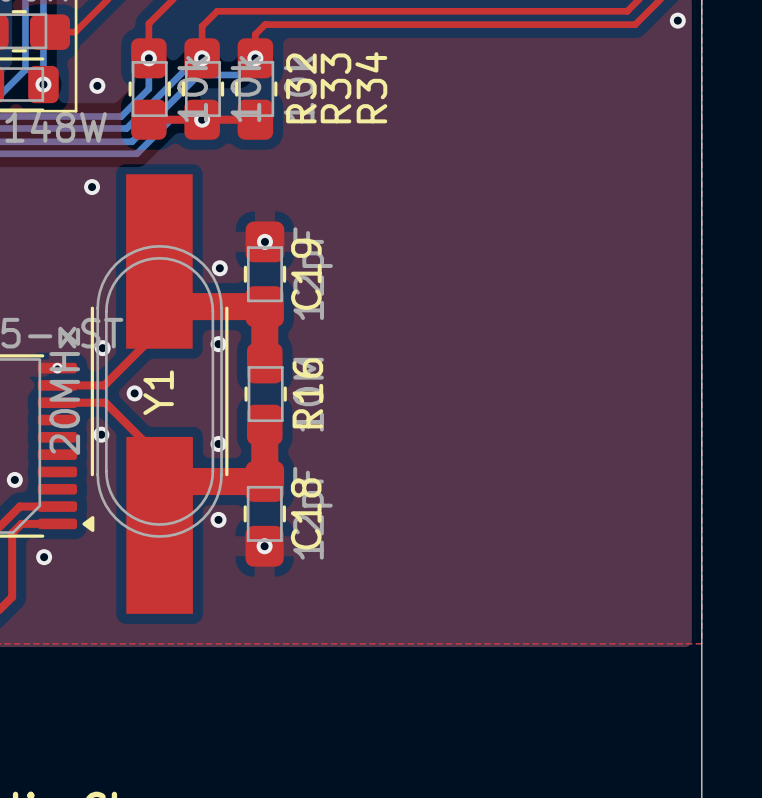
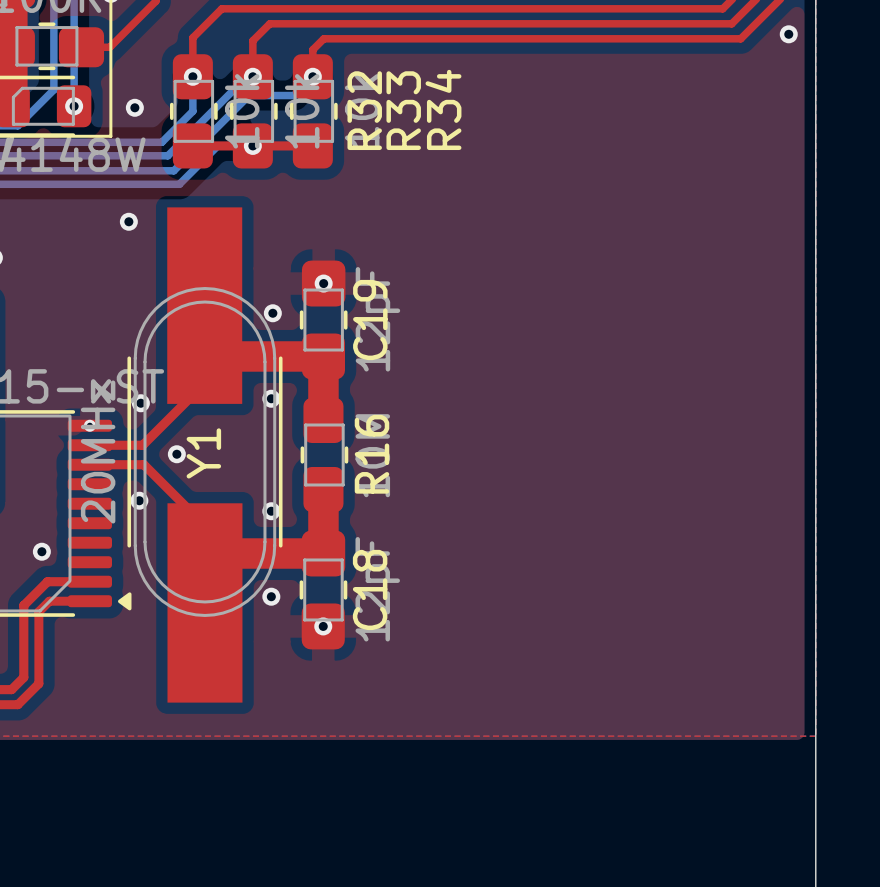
via: (44, 557) -> none

